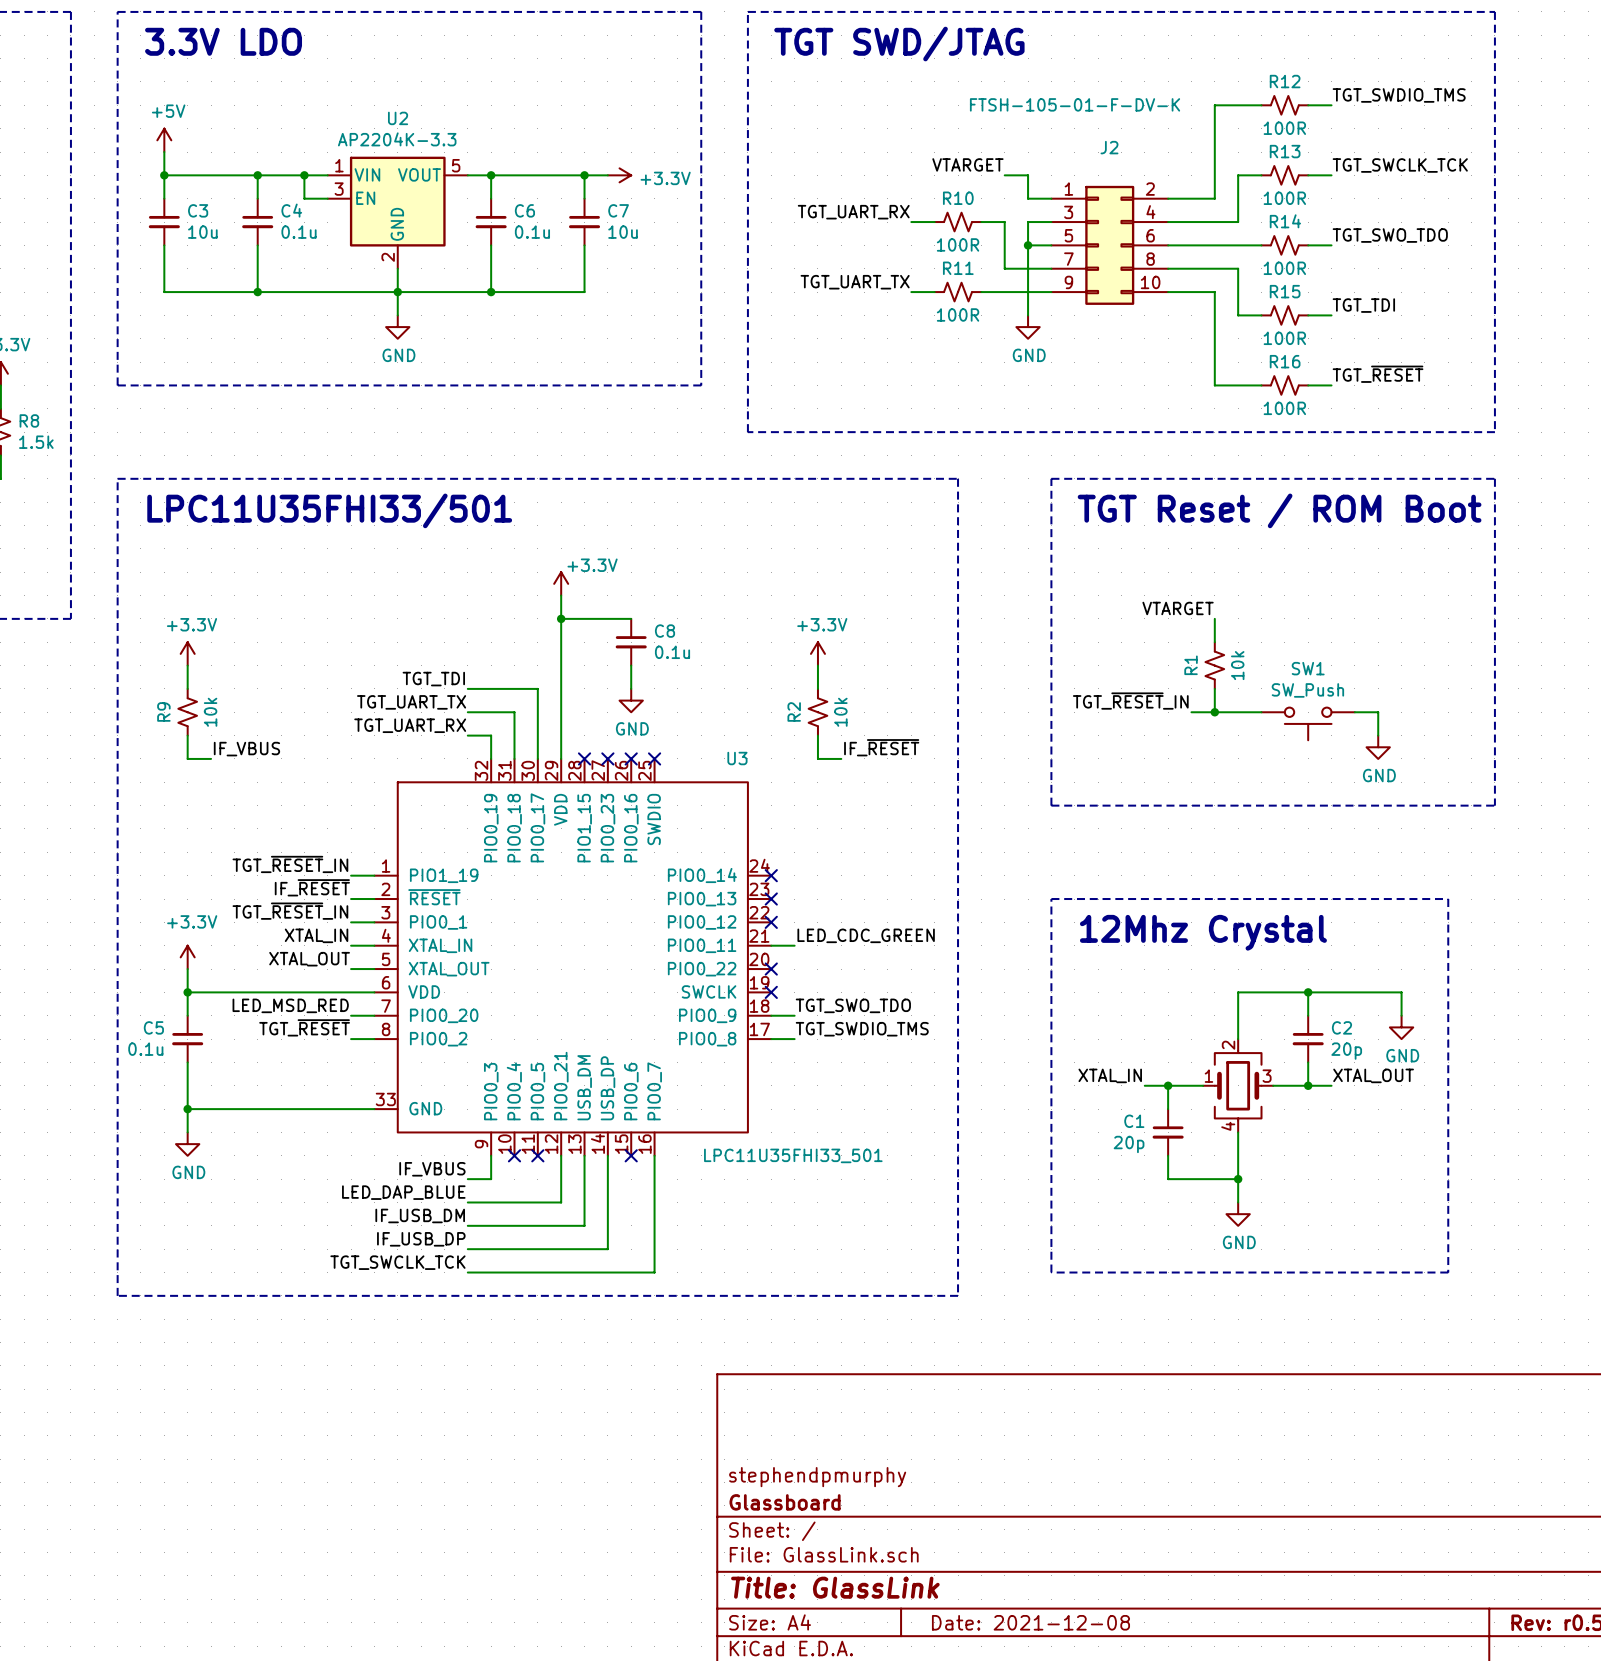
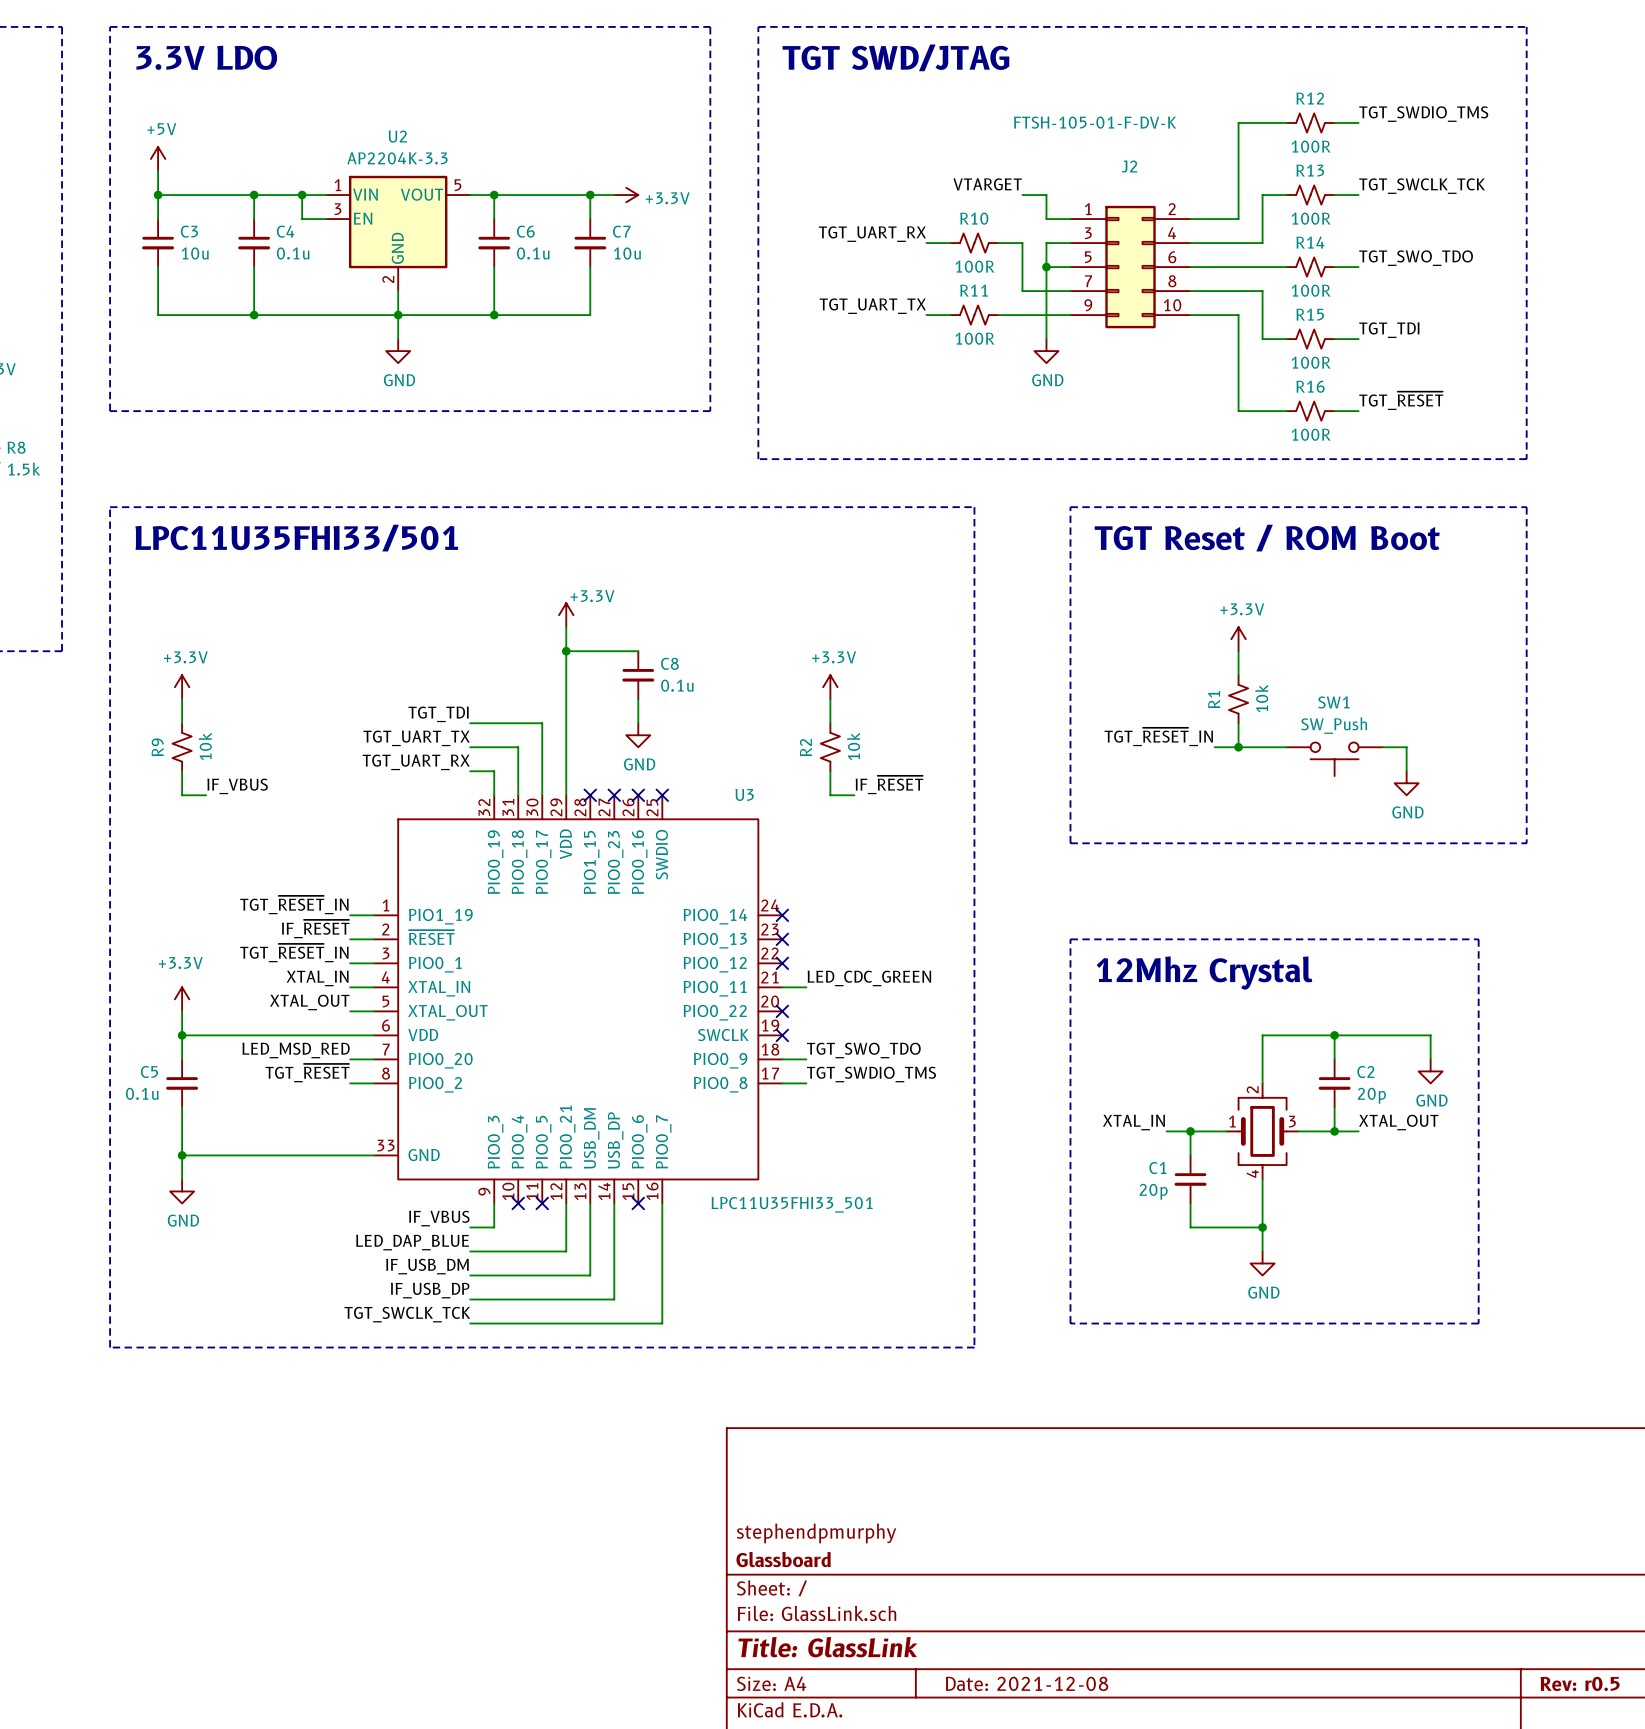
power symbol: none -> +3.3V (1238, 639)
label: VTARGET (1178, 608) -> none

